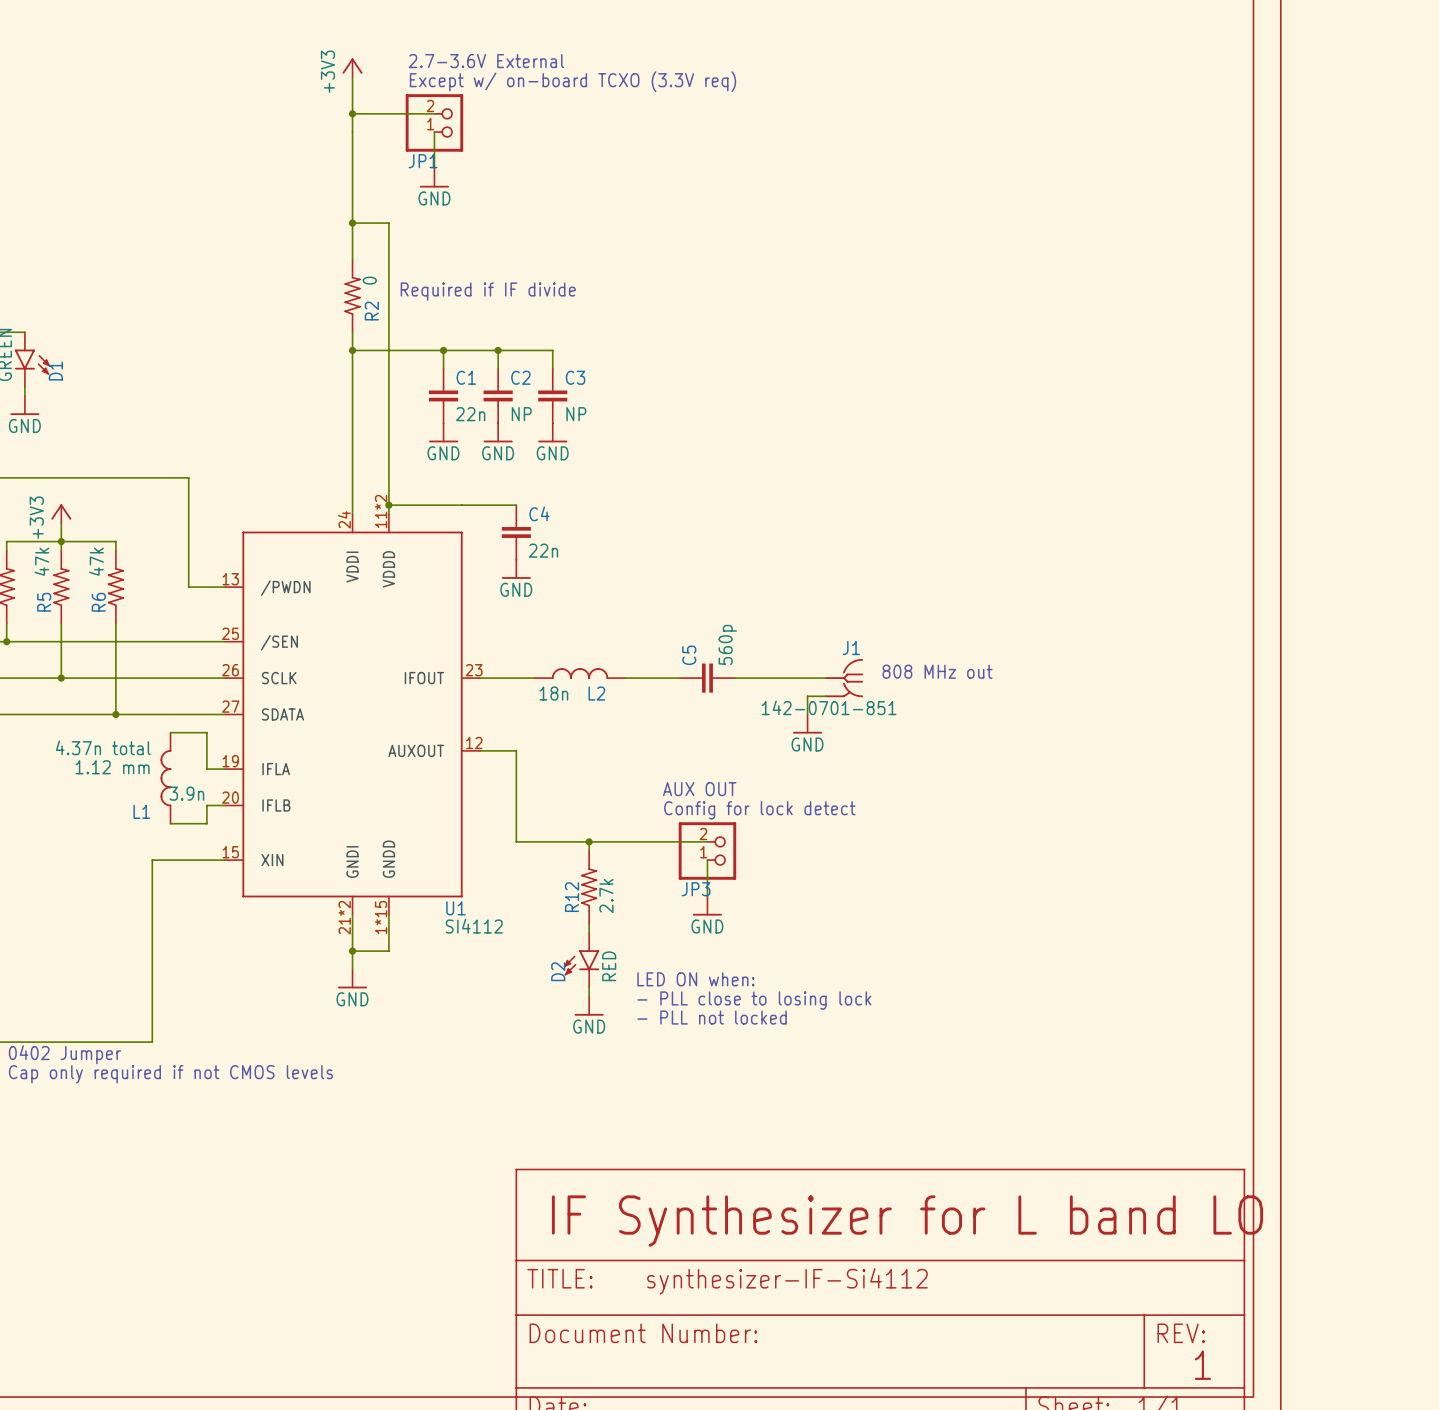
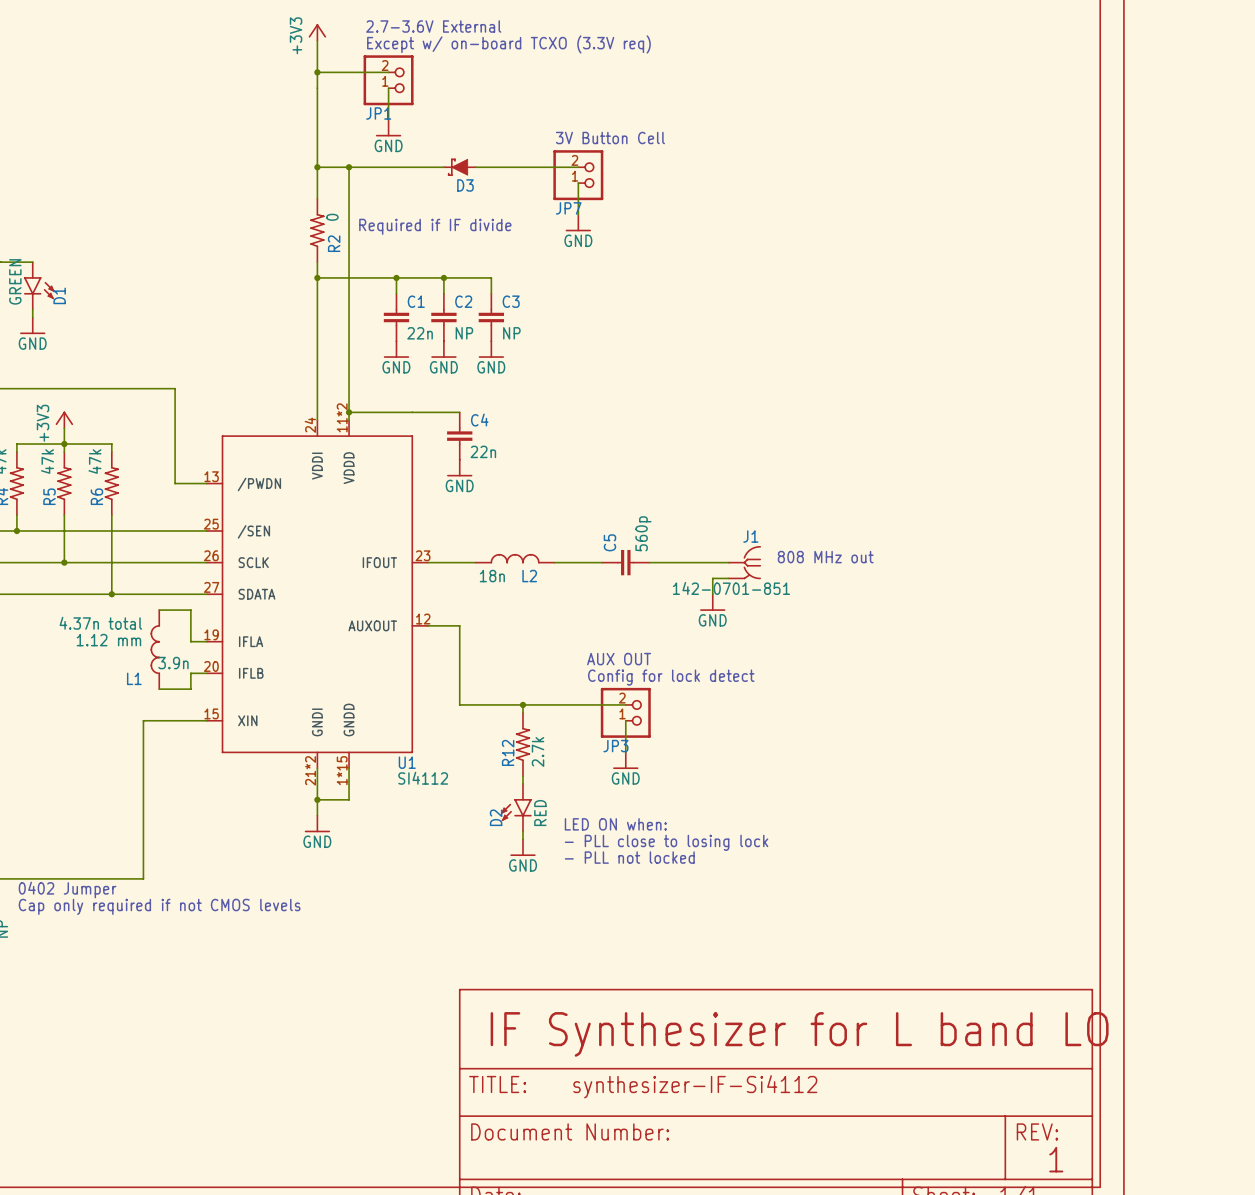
text: none -> 3V Button Cell (610, 138)
wire: none -> (349, 167) (443, 167)
junction: none -> (349, 167)
D3: none -> (459, 167)
wire: none -> (475, 167) (578, 167)
JP7: none -> (578, 175)
wire: none -> (578, 183) (578, 214)
power symbol: none -> GND (578, 223)

